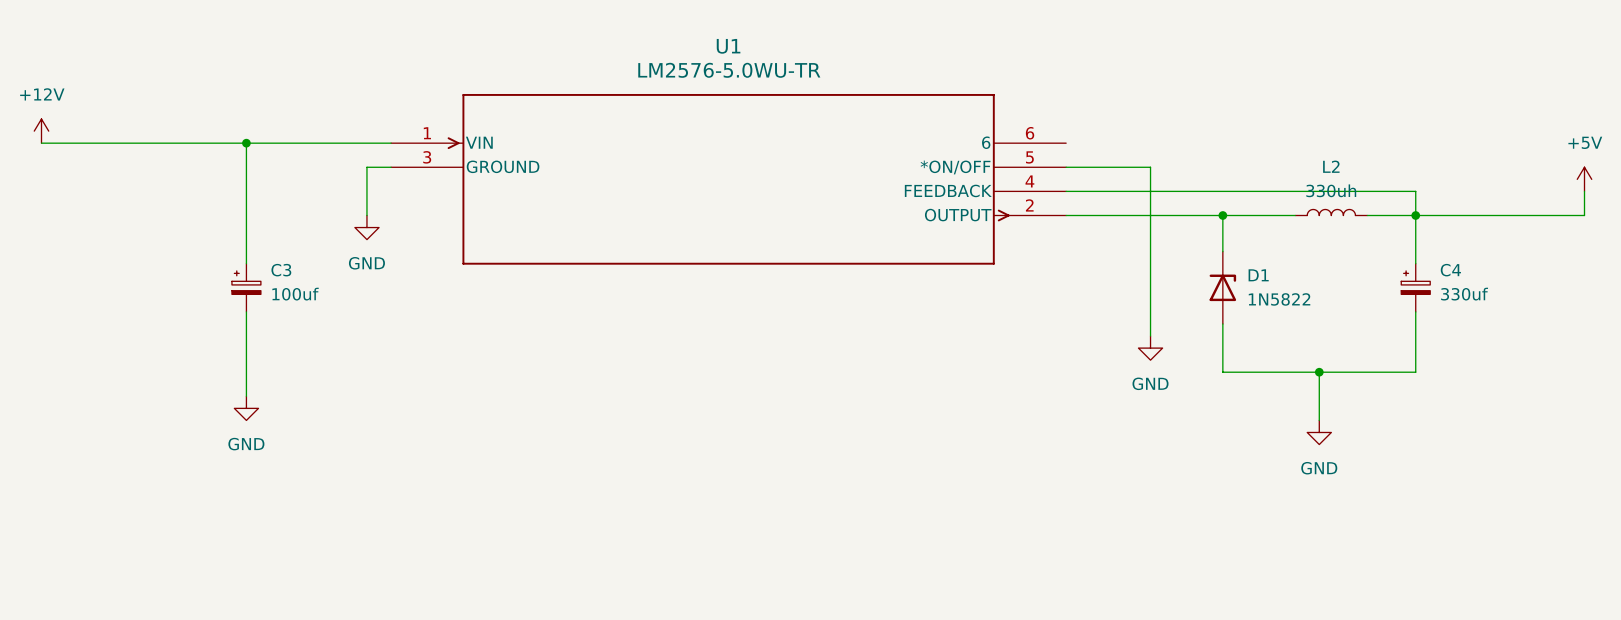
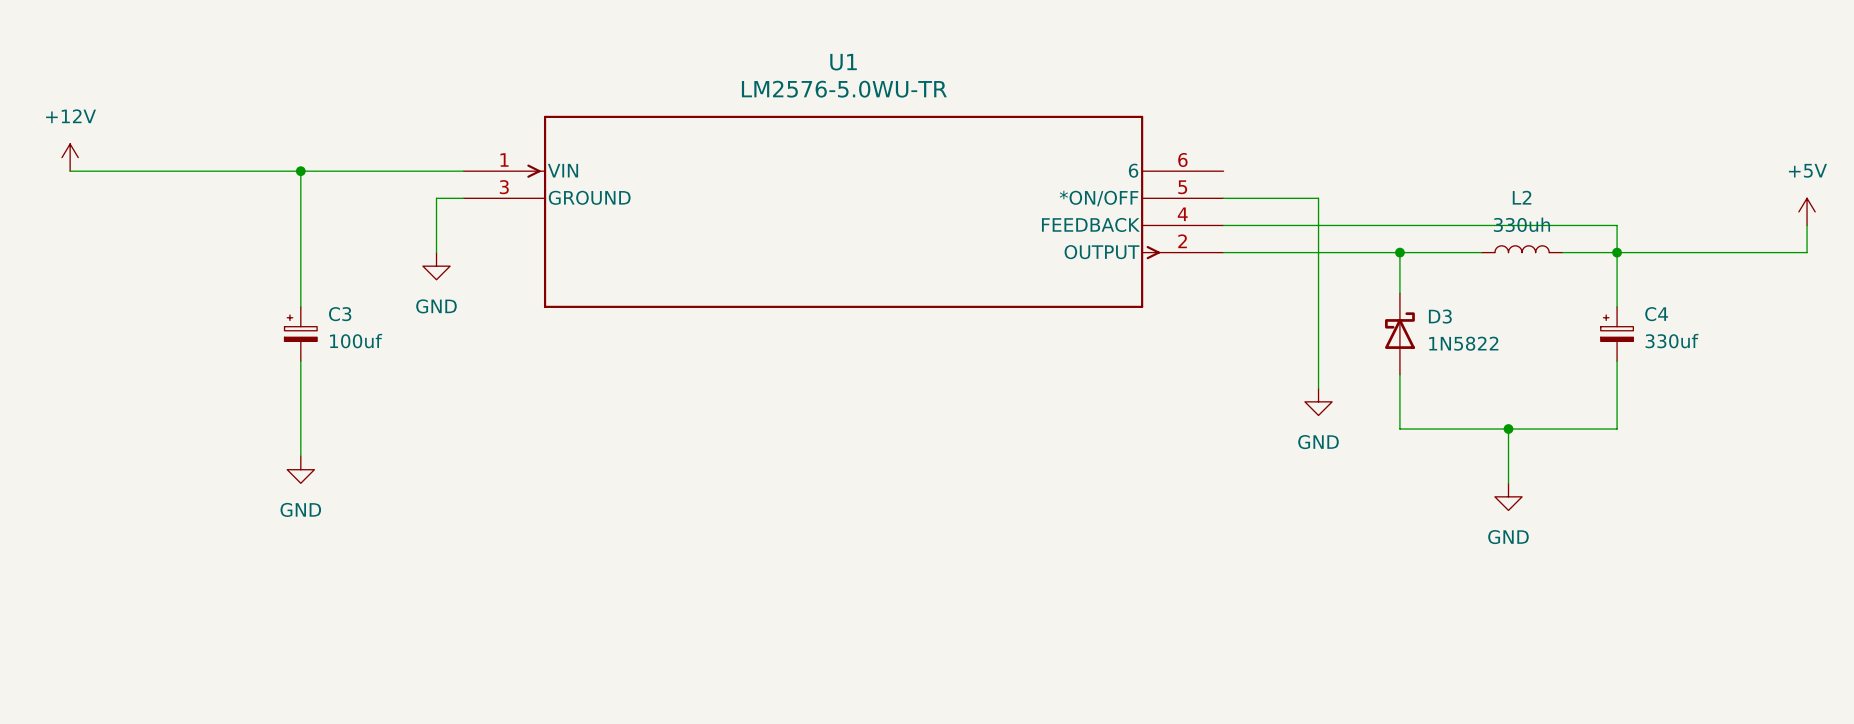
D1: 1N5822 (1222, 287) -> none
D3: none -> 1N5822 (1399, 334)

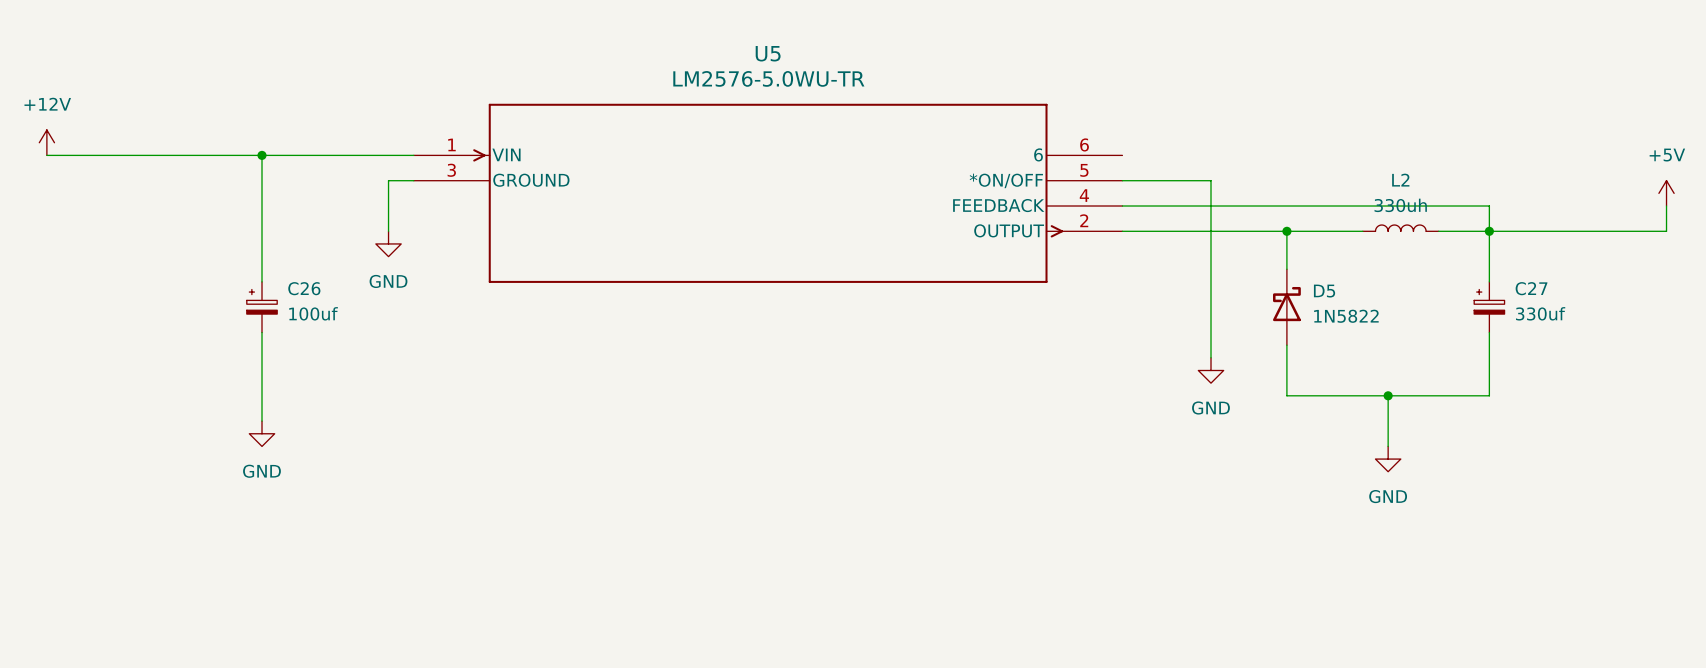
U1 name: U1 (843, 62) -> U5 (768, 53)
C3 name: C3 (340, 314) -> C26 (304, 288)
C4 name: C4 (1656, 314) -> C27 (1531, 288)
D3 name: D3 (1440, 316) -> D5 (1324, 291)

